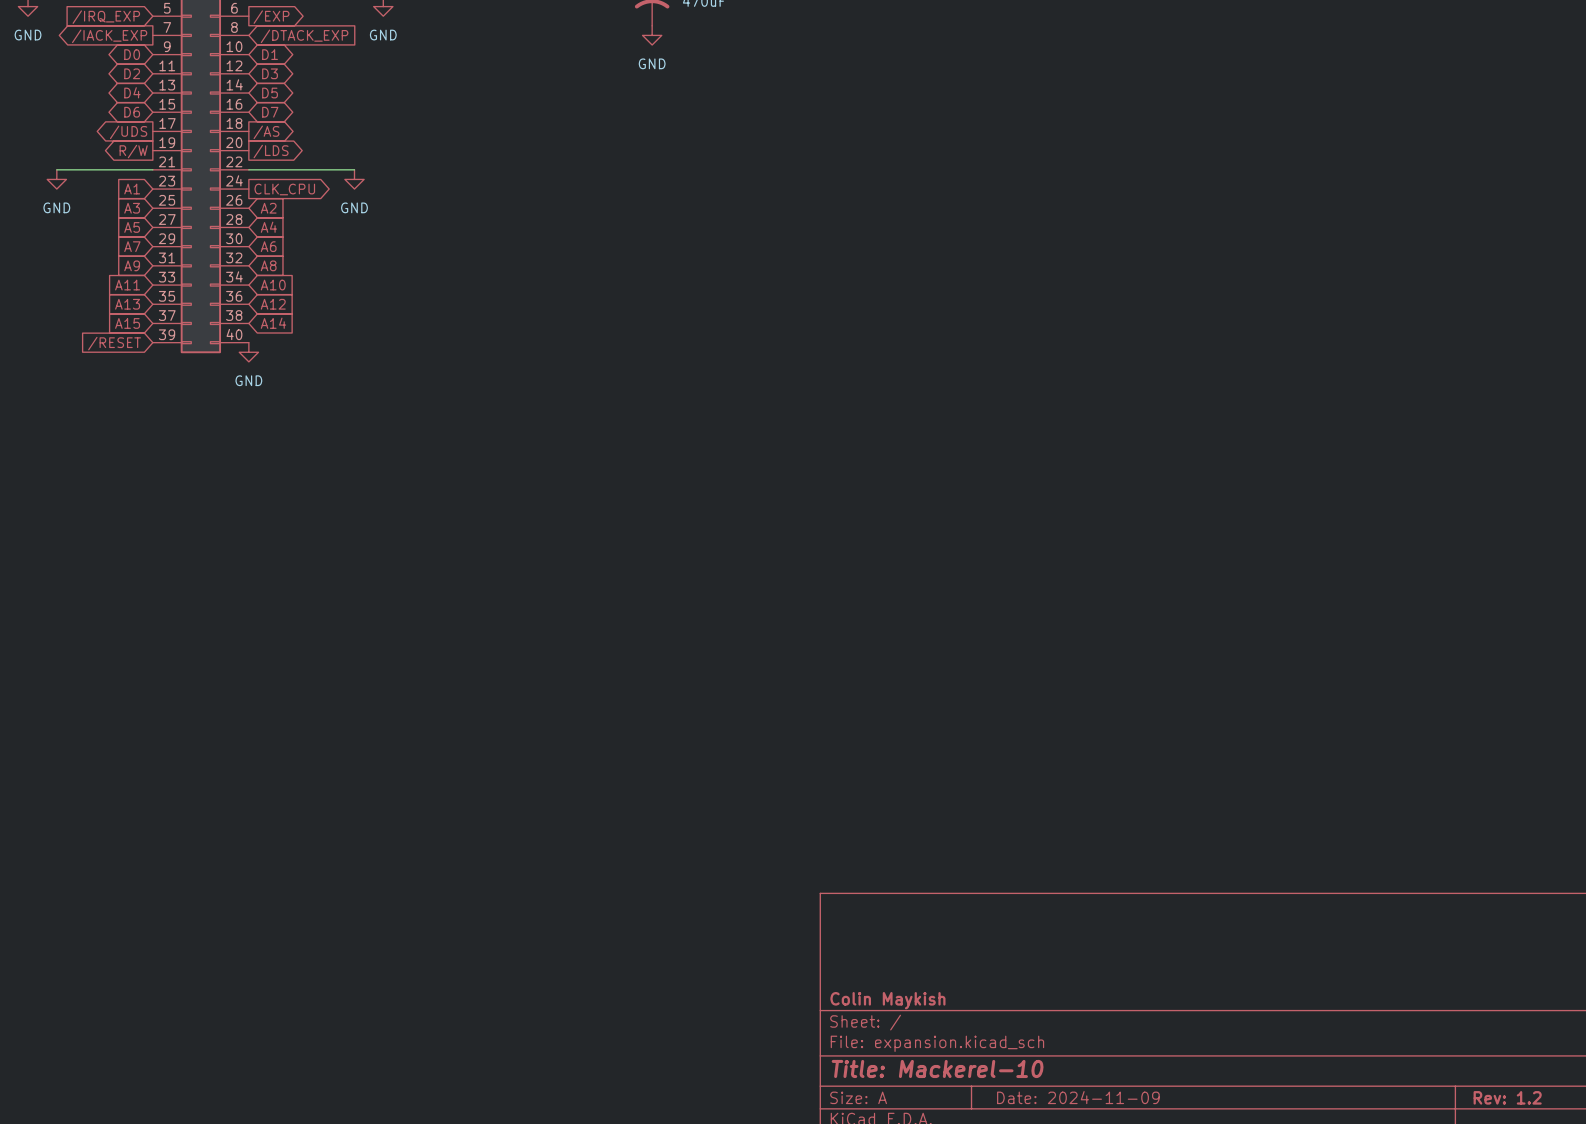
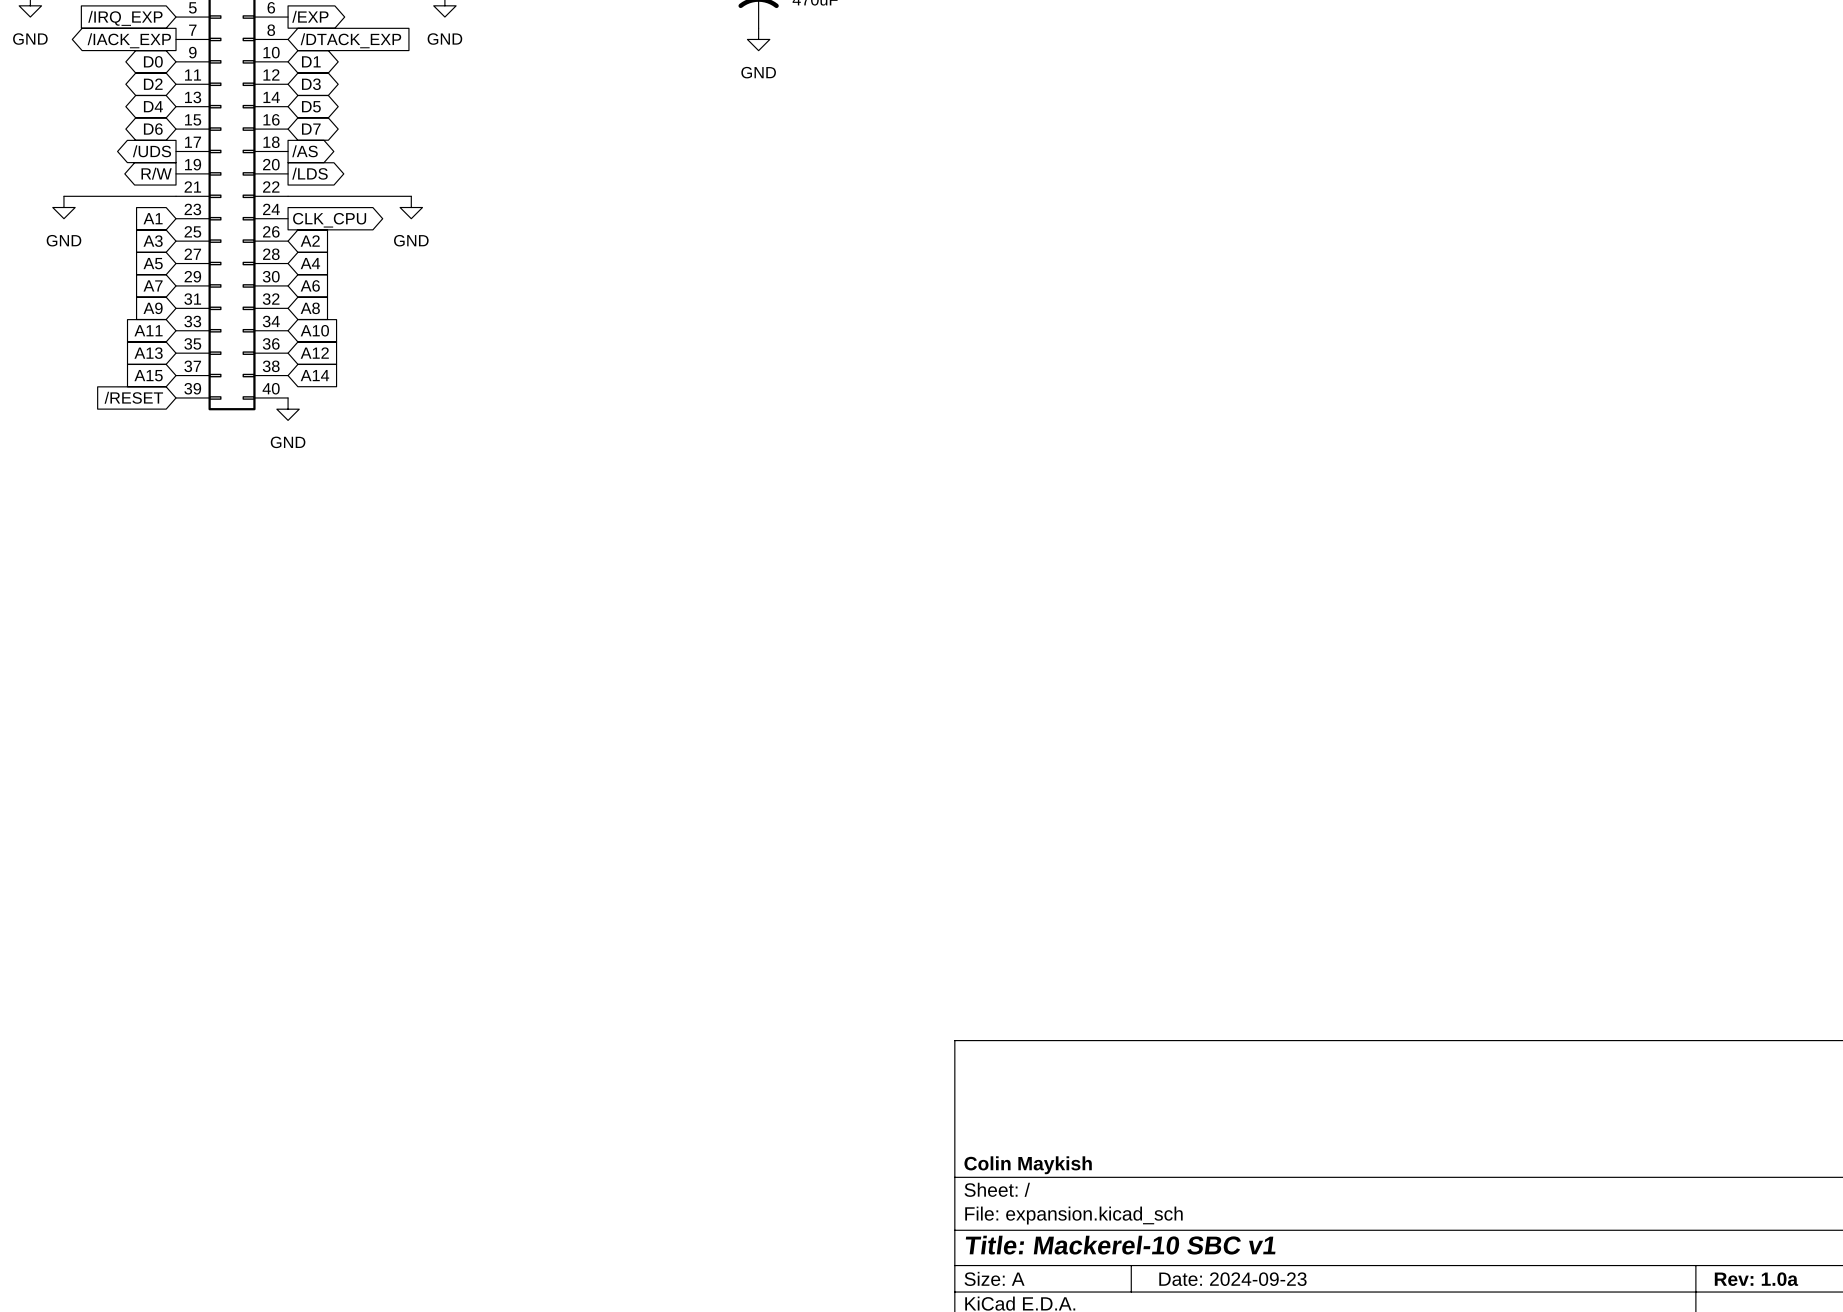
title block: Title: Mackerel-10 (937, 1068) -> Title: Mackerel-10 SBC v1 (1120, 1245)
title block: Date: 2024-11-09 (1078, 1097) -> Date: 2024-09-23 (1232, 1279)
title block: Rev: 1.2 (1507, 1097) -> Rev: 1.0a (1756, 1279)

